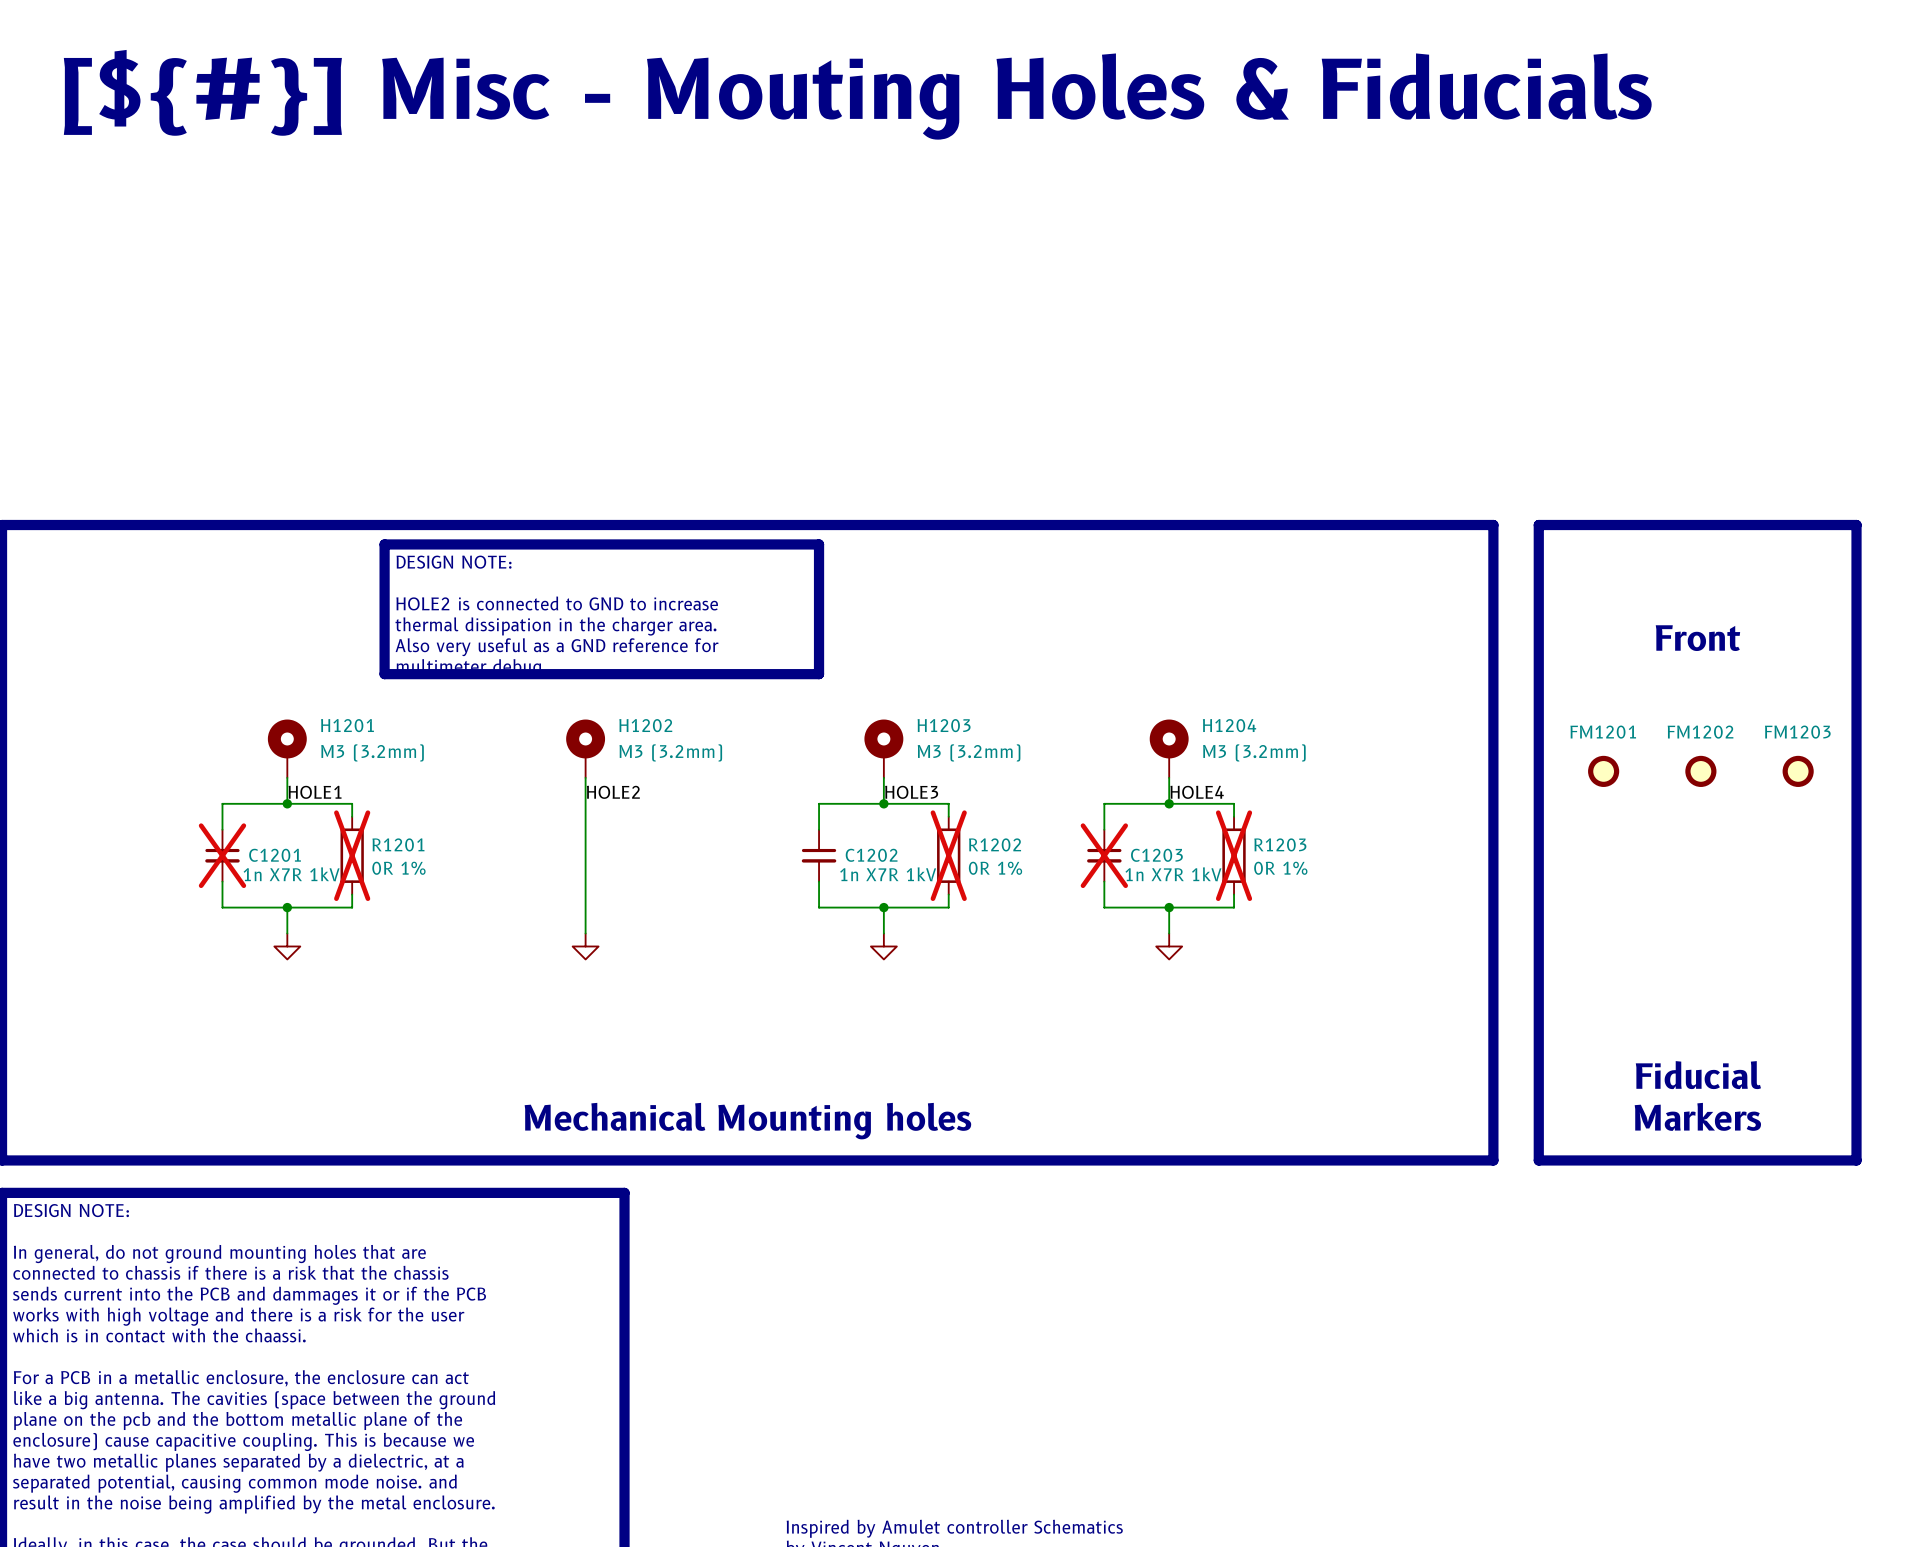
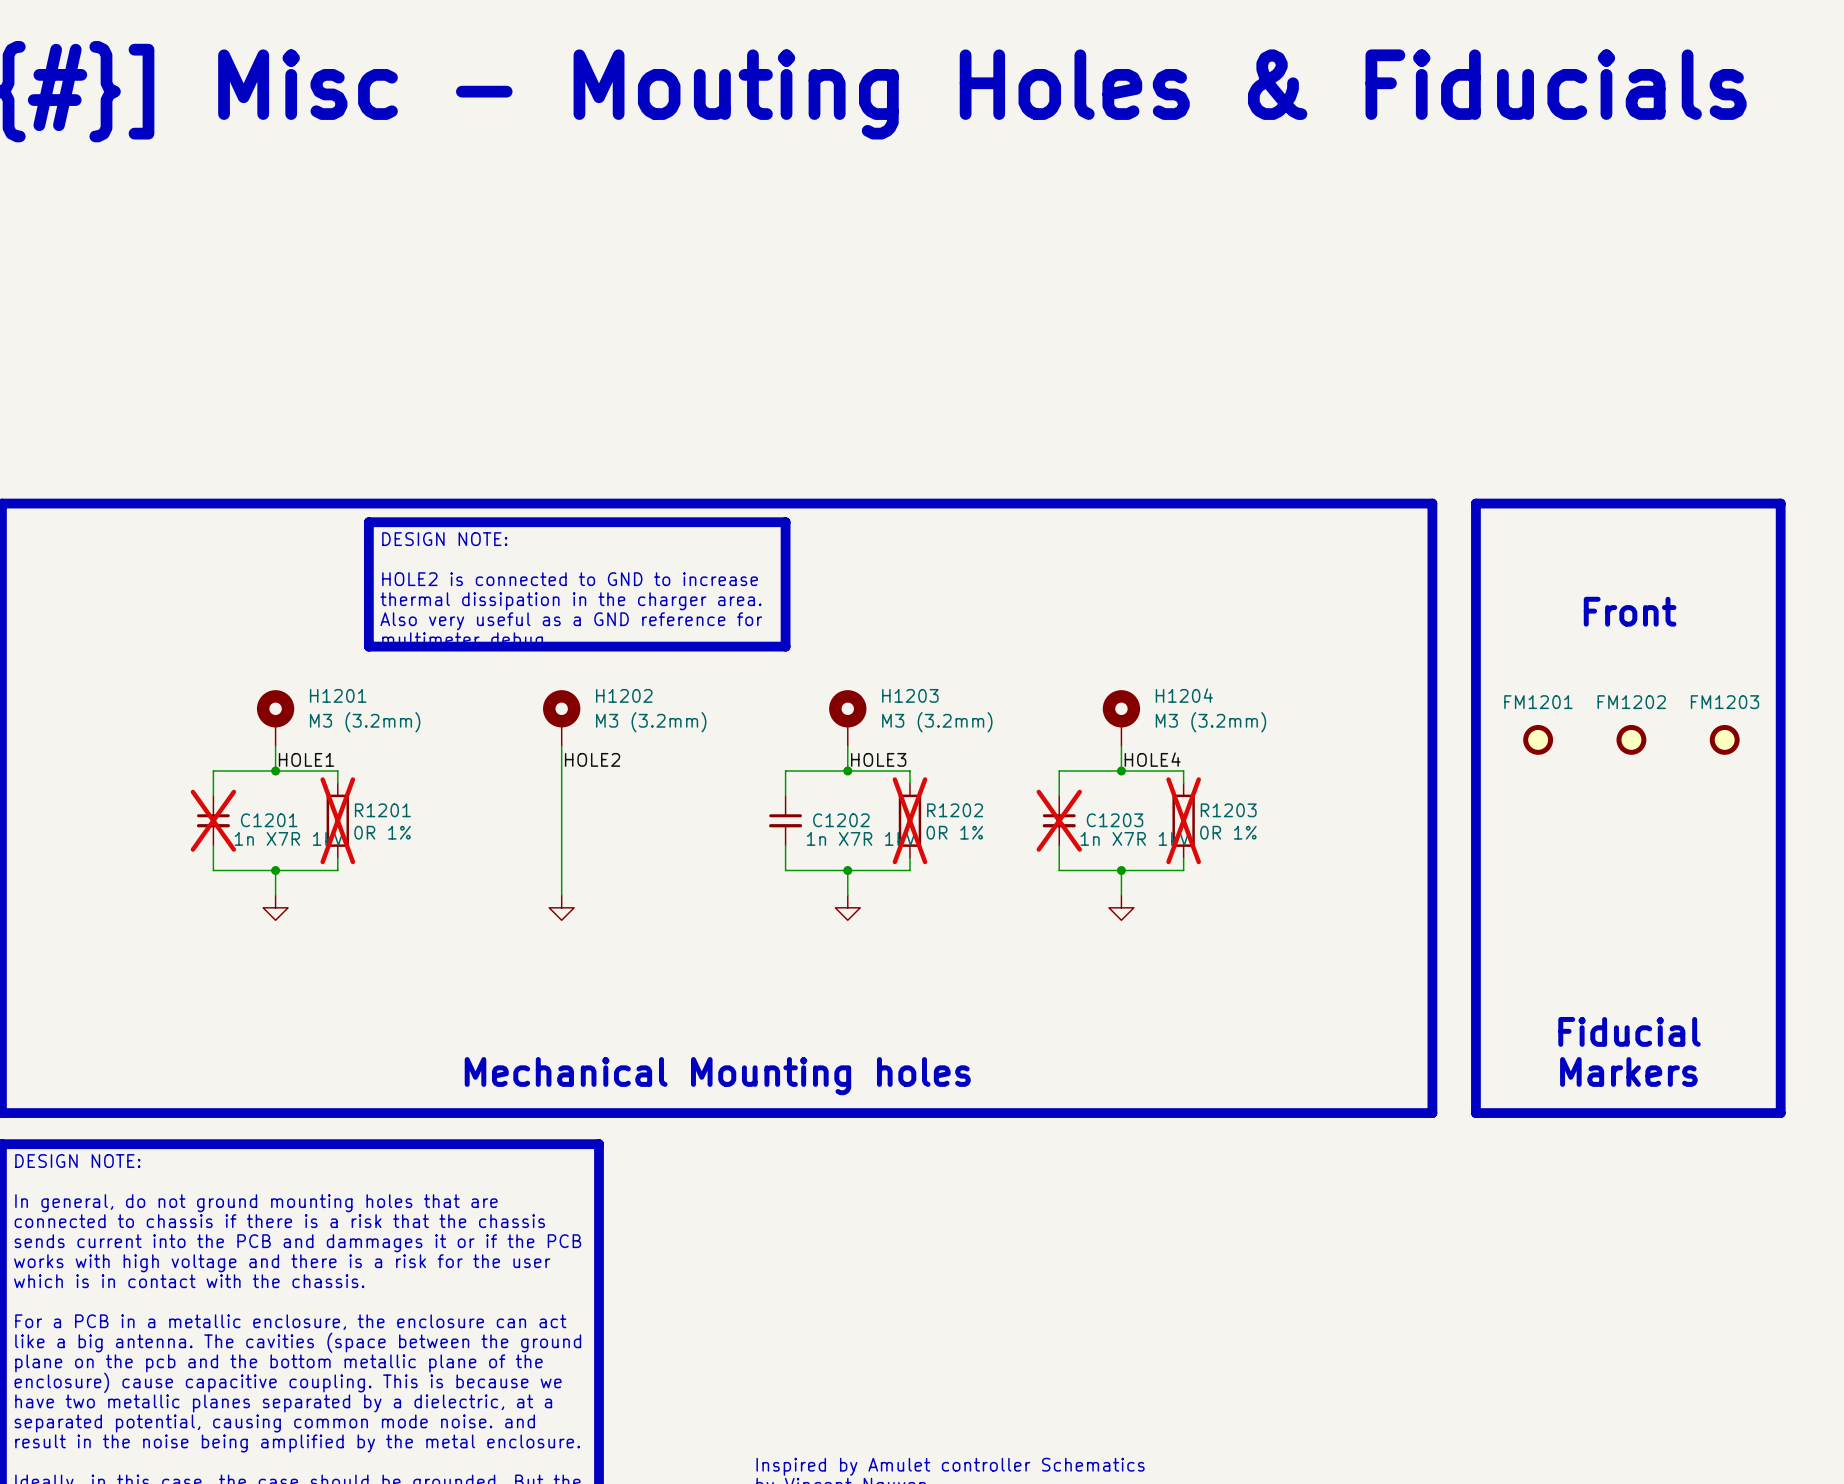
text: which is in contact with the chaassi. (159, 1335) -> which is in contact with the chassis. (189, 1281)

